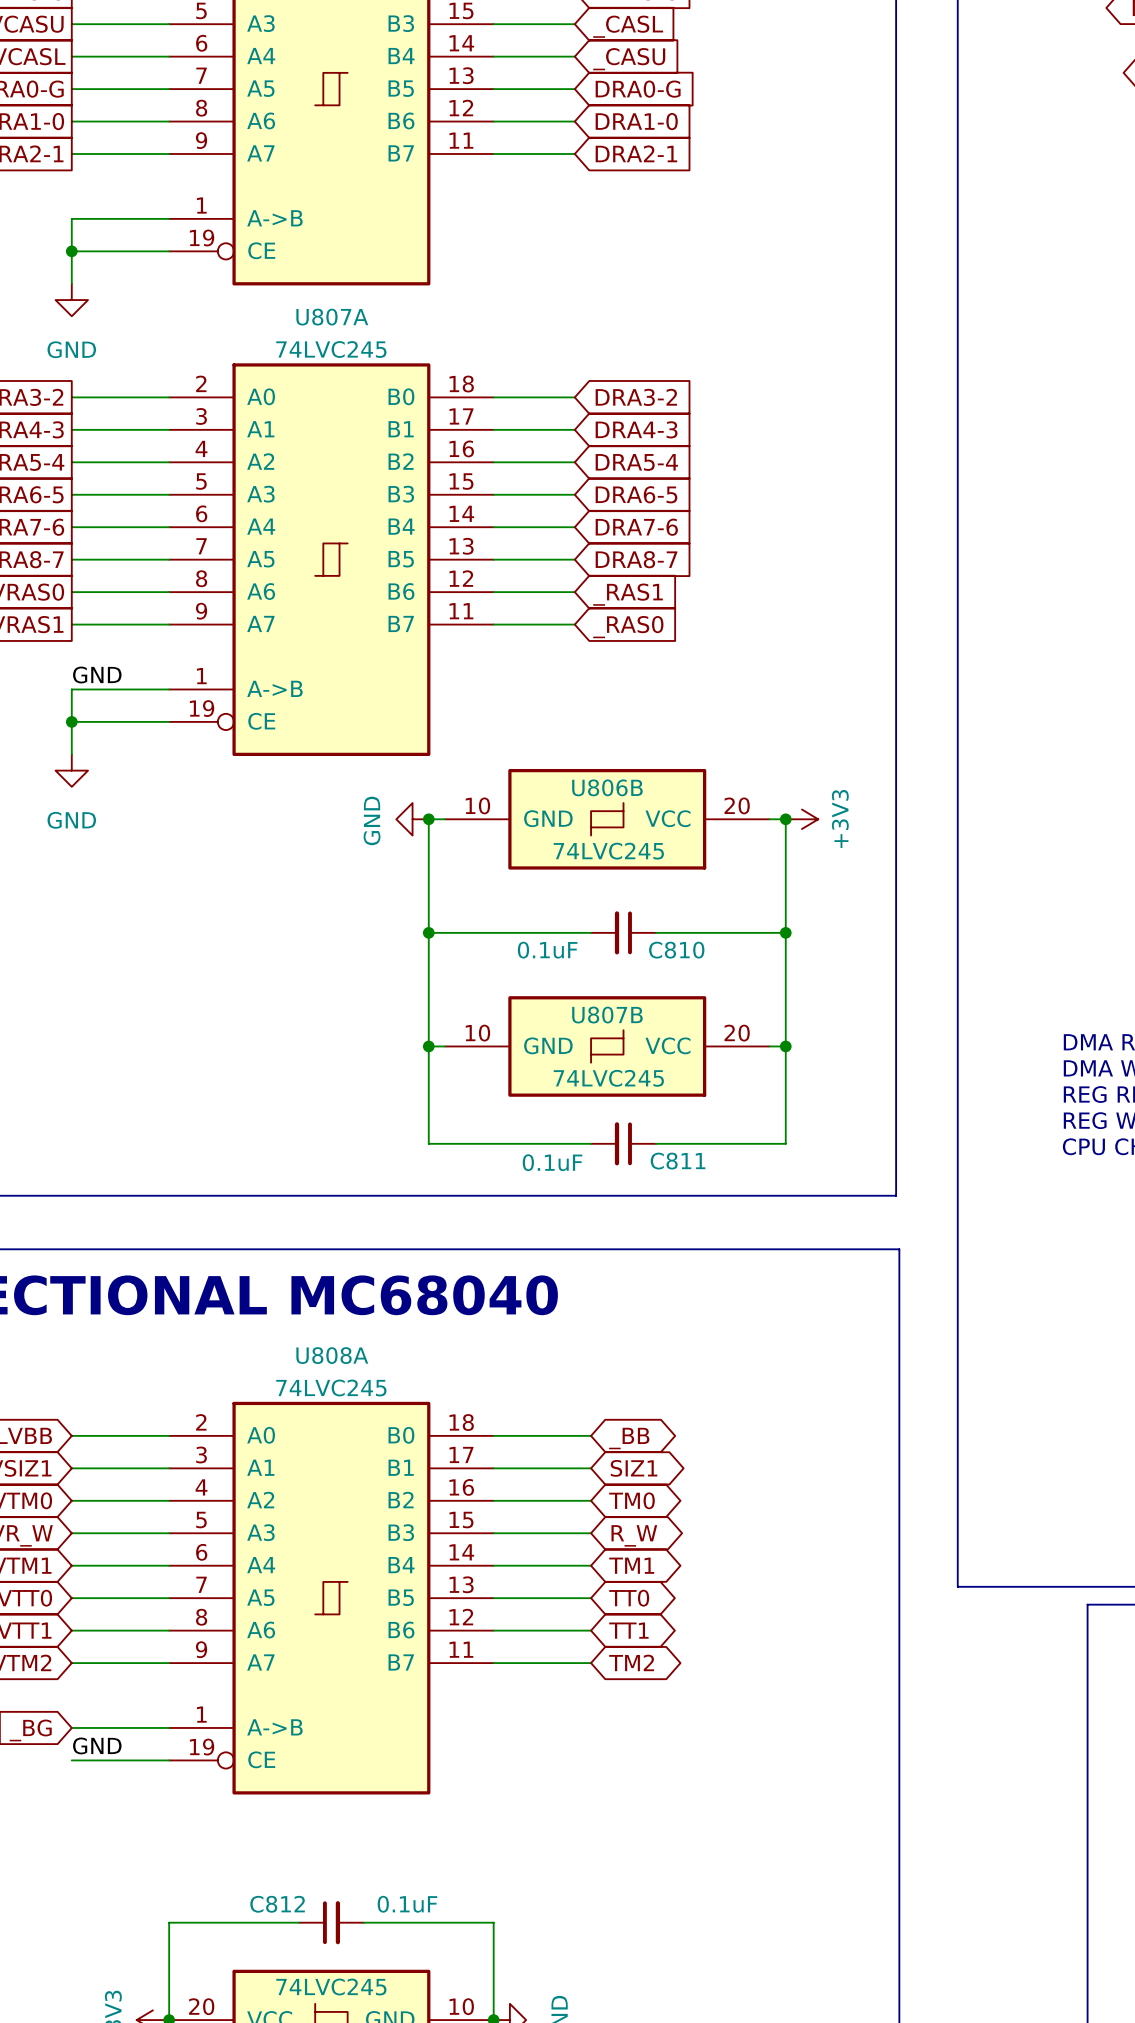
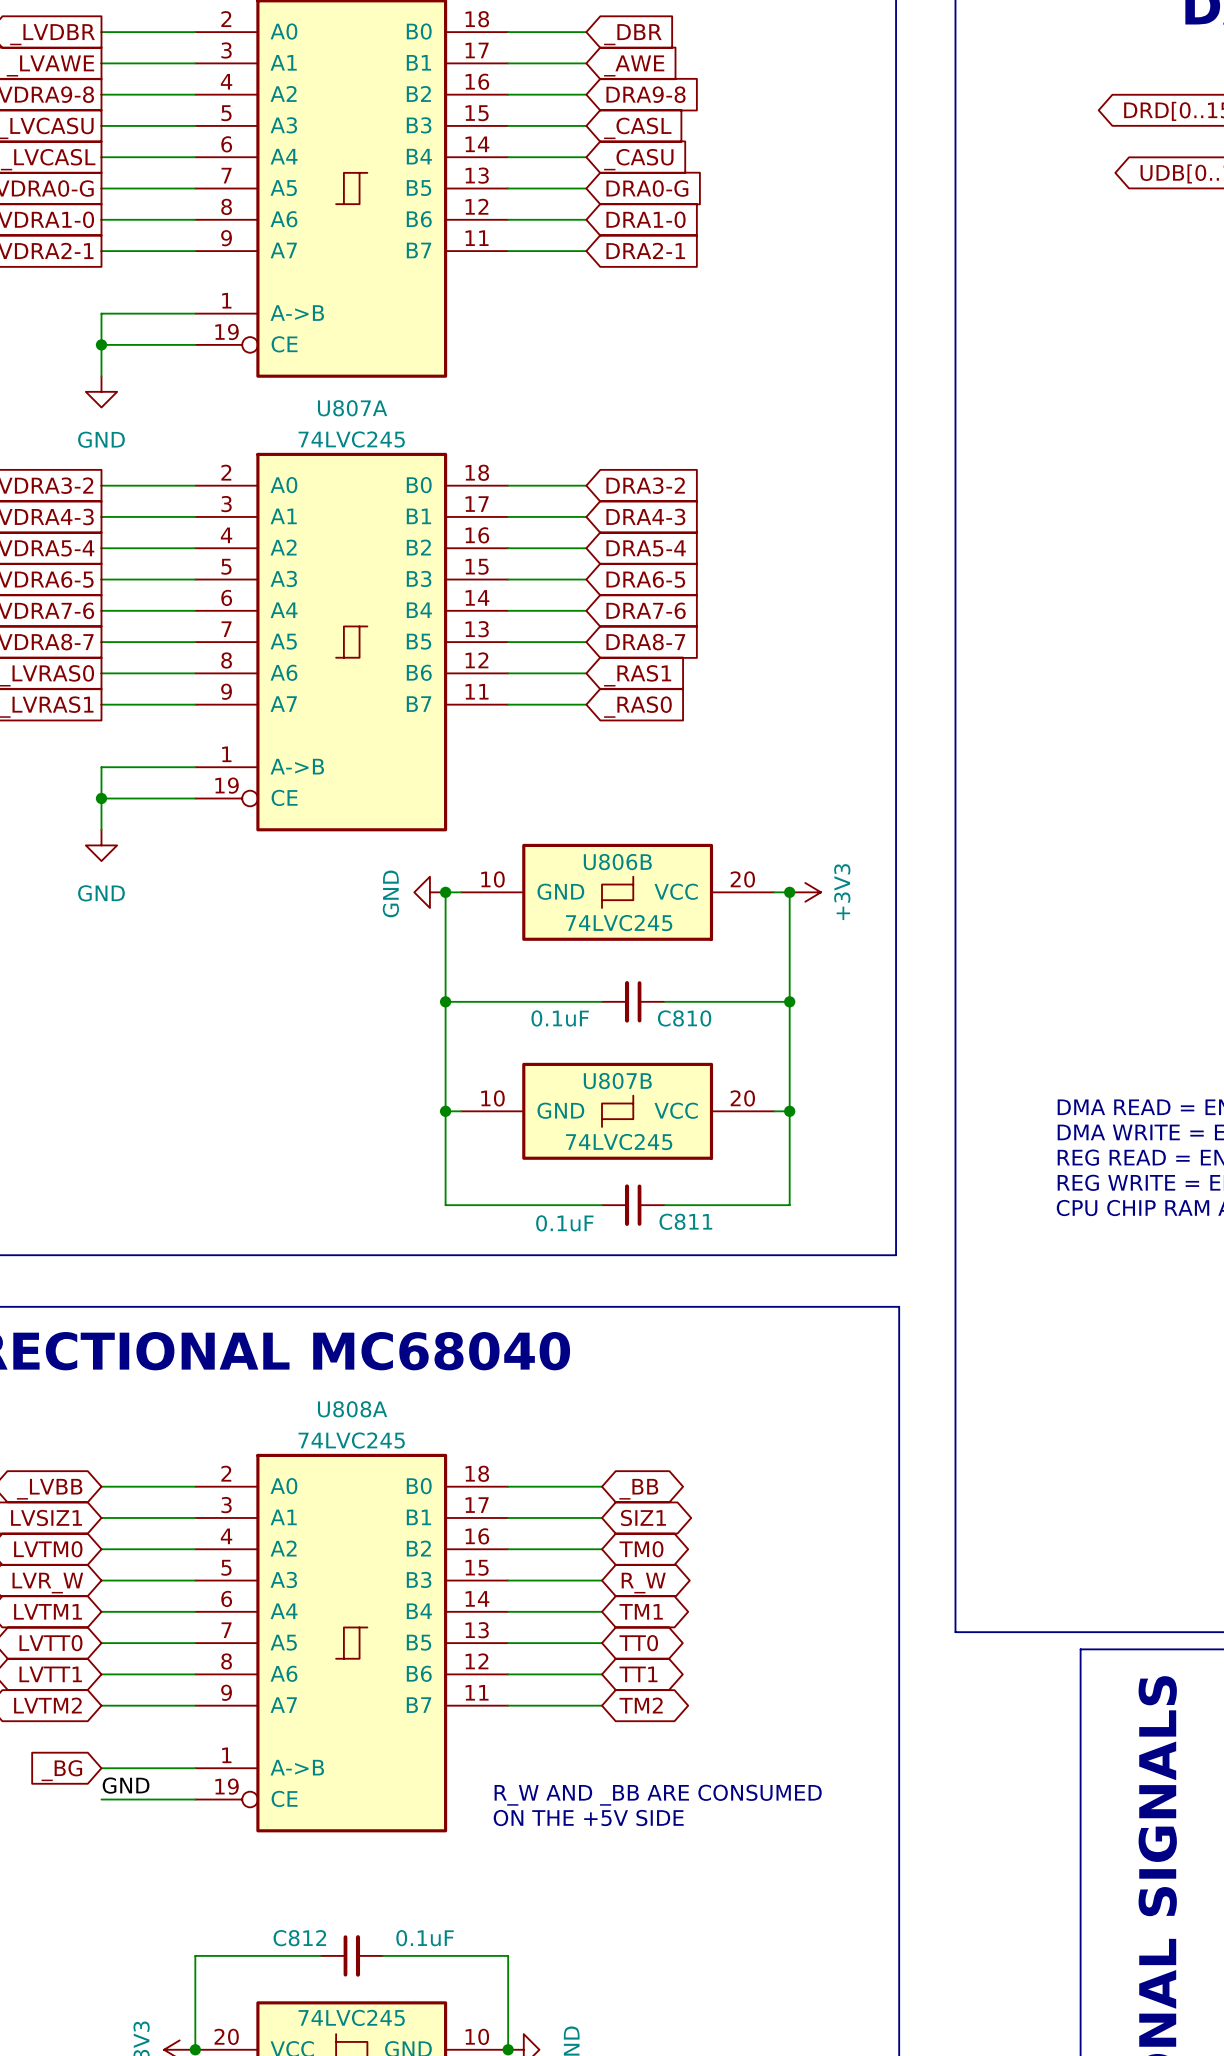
label: GND (97, 675) -> none
text: none -> R_W AND _BB ARE CONSUMED (658, 1795)
text: none -> ON THE +5V SIDE (588, 1818)

